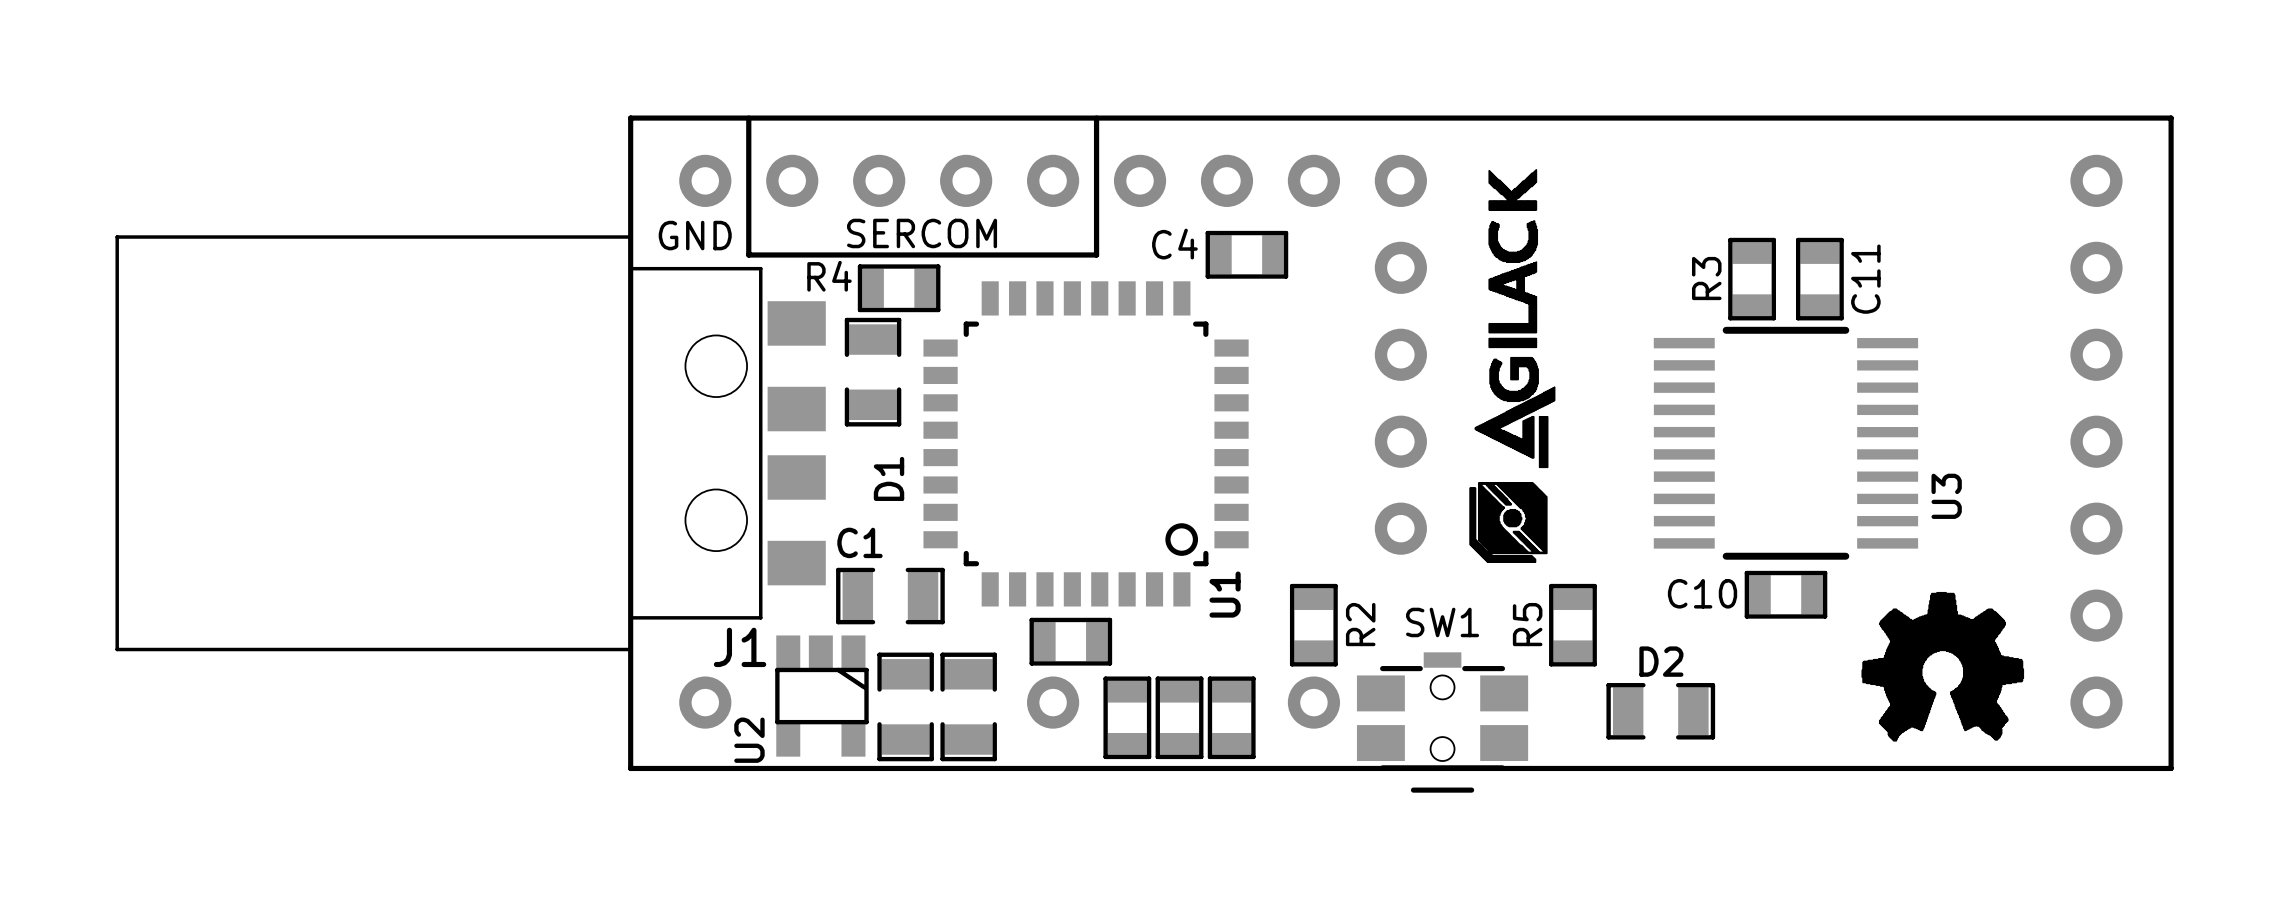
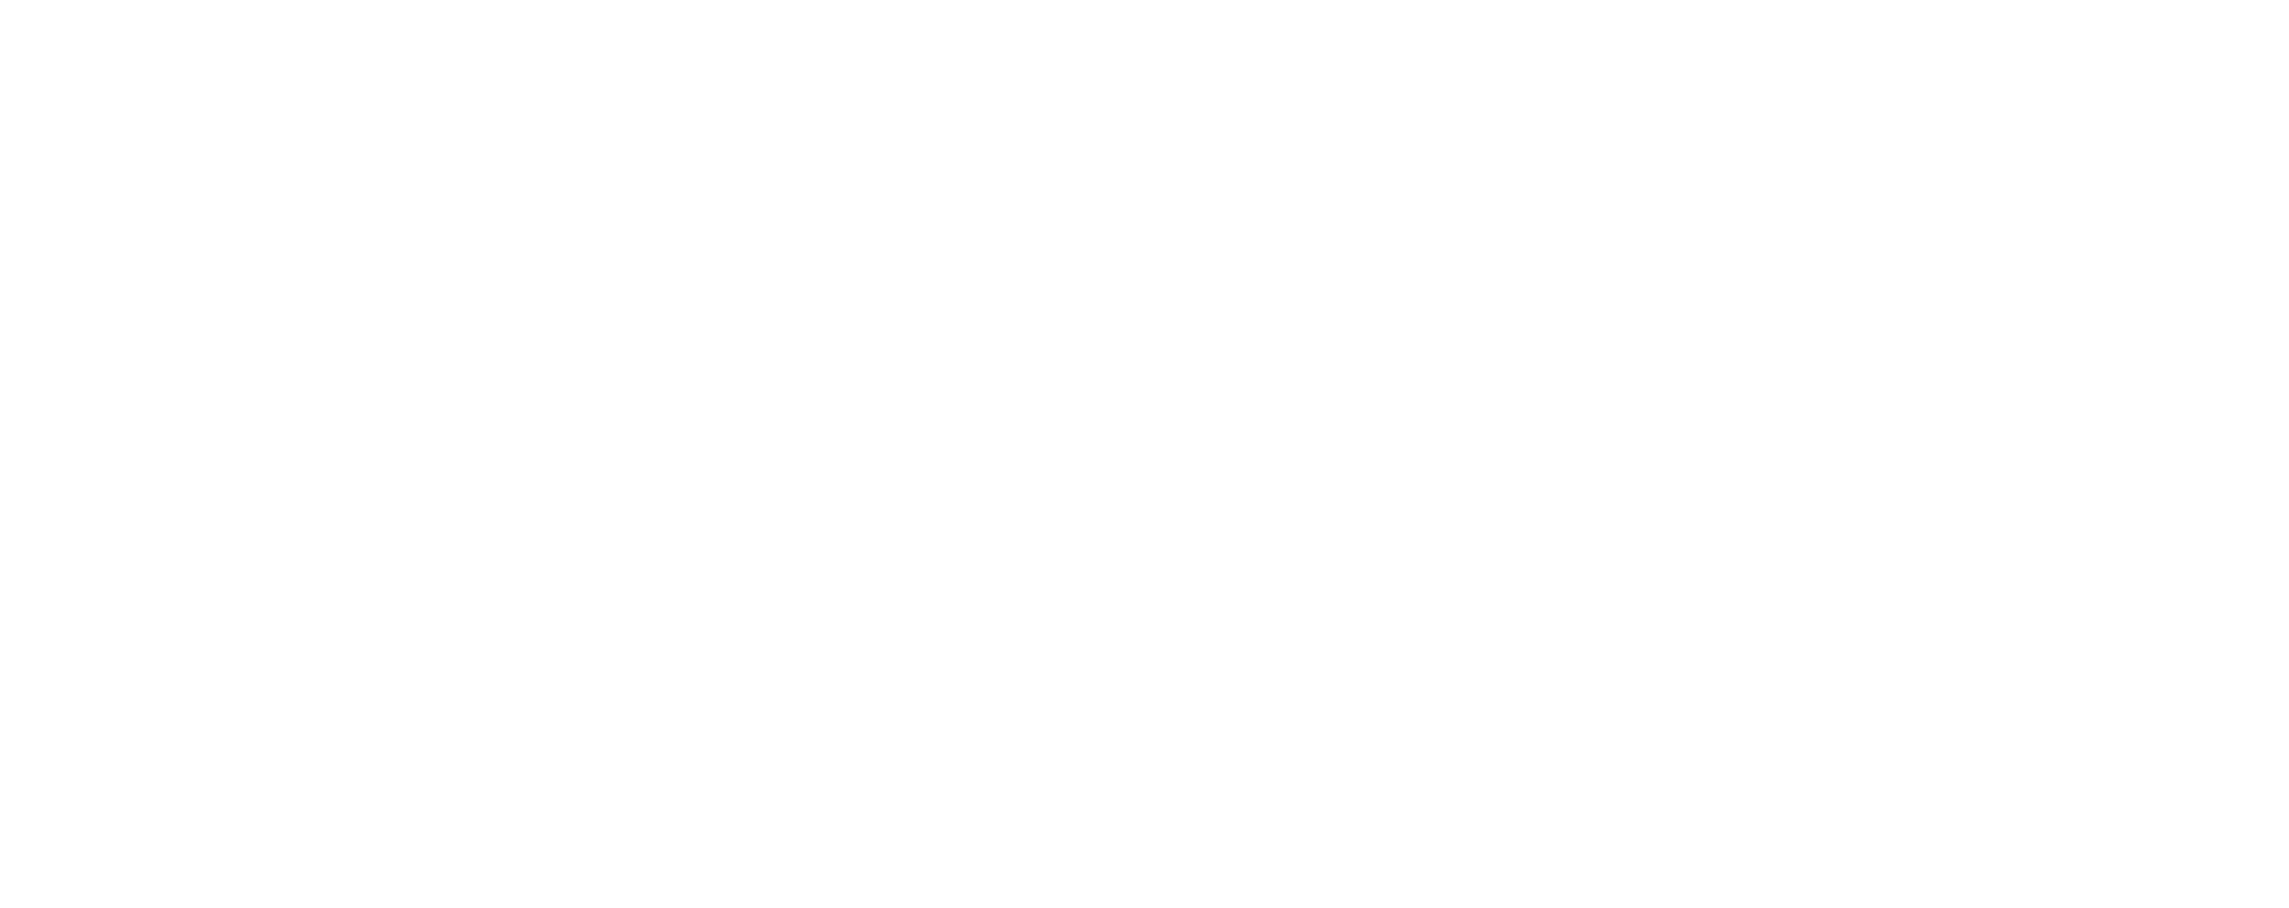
board edge: (630, 118) (630, 768) (2171, 768) (2171, 118) (630, 118) -> none
line: (748, 118) (748, 254) (1096, 254) (1096, 118) -> none
drawing: [1469, 169, 1556, 563] -> none
part: (705, 180) -> none
part: (792, 180) -> none
part: (879, 180) -> none
part: (966, 180) -> none
part: (1053, 180) -> none
part: (1140, 180) -> none
part: (1226, 180) -> none
part: (1313, 180) -> none
part: (1400, 180) -> none
part: (2096, 180) -> none
text: SERCOM (922, 233) -> none
text: GND (695, 235) -> none
C4: (1246, 254) -> none
part: (1400, 267) -> none
part: (2096, 267) -> none
R3: (1752, 279) -> none
C11: (1819, 279) -> none
R4: (899, 288) -> none
part: (1400, 354) -> none
part: (2096, 354) -> none
D1: (873, 372) -> none
part: (1400, 441) -> none
part: (2096, 441) -> none
J1: (470, 443) -> none
U1: (1086, 443) -> none
U3: (1785, 443) -> none
part: (1400, 528) -> none
part: (2096, 528) -> none
drawing: [1861, 592, 2024, 742] -> none
C10: (1785, 594) -> none
C1: (890, 596) -> none
part: (2096, 615) -> none
R2: (1313, 625) -> none
R5: (1572, 625) -> none
part: (1070, 641) -> none
U2: (821, 696) -> none
part: (705, 702) -> none
part: (1053, 702) -> none
part: (1313, 702) -> none
part: (2096, 702) -> none
part: (905, 706) -> none
part: (968, 706) -> none
D2: (1660, 711) -> none
part: (1127, 717) -> none
part: (1179, 717) -> none
part: (1231, 717) -> none
SW1: (1442, 722) -> none

